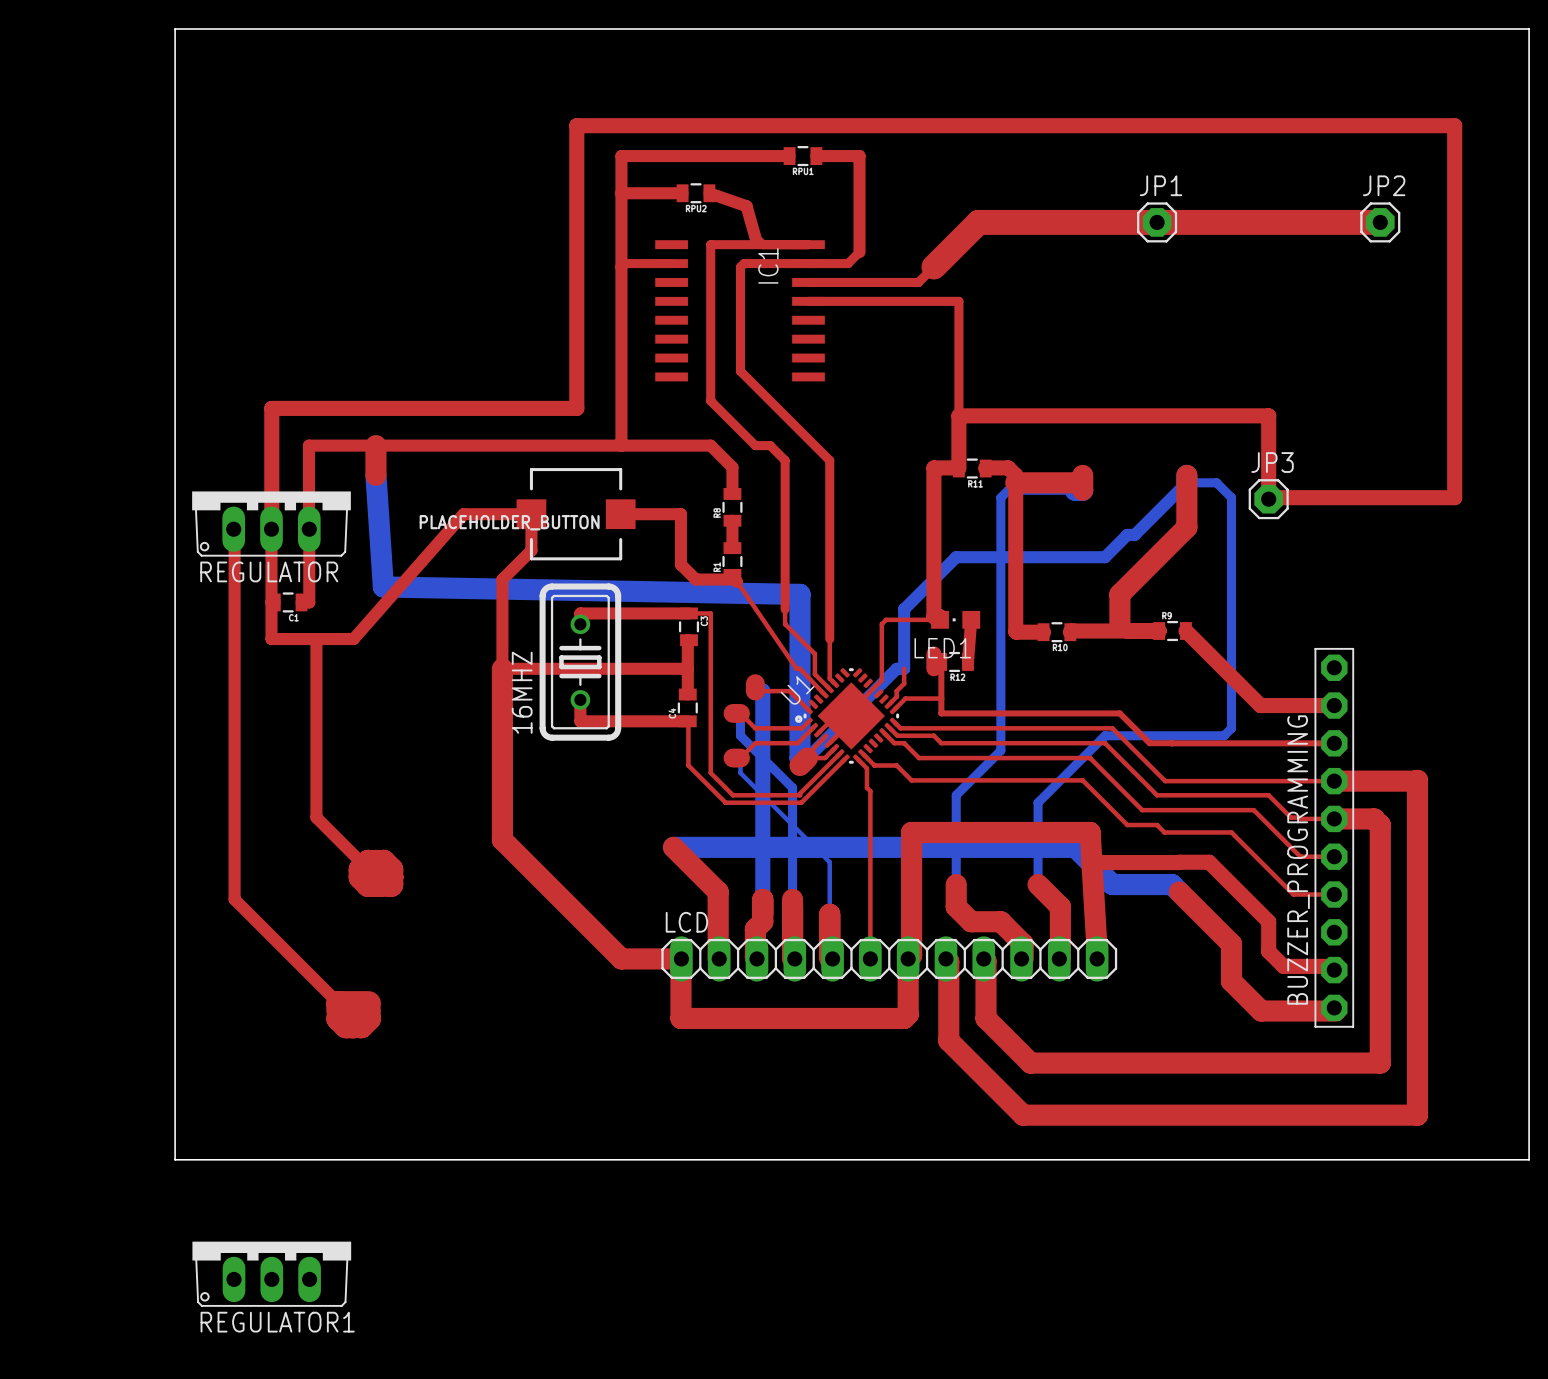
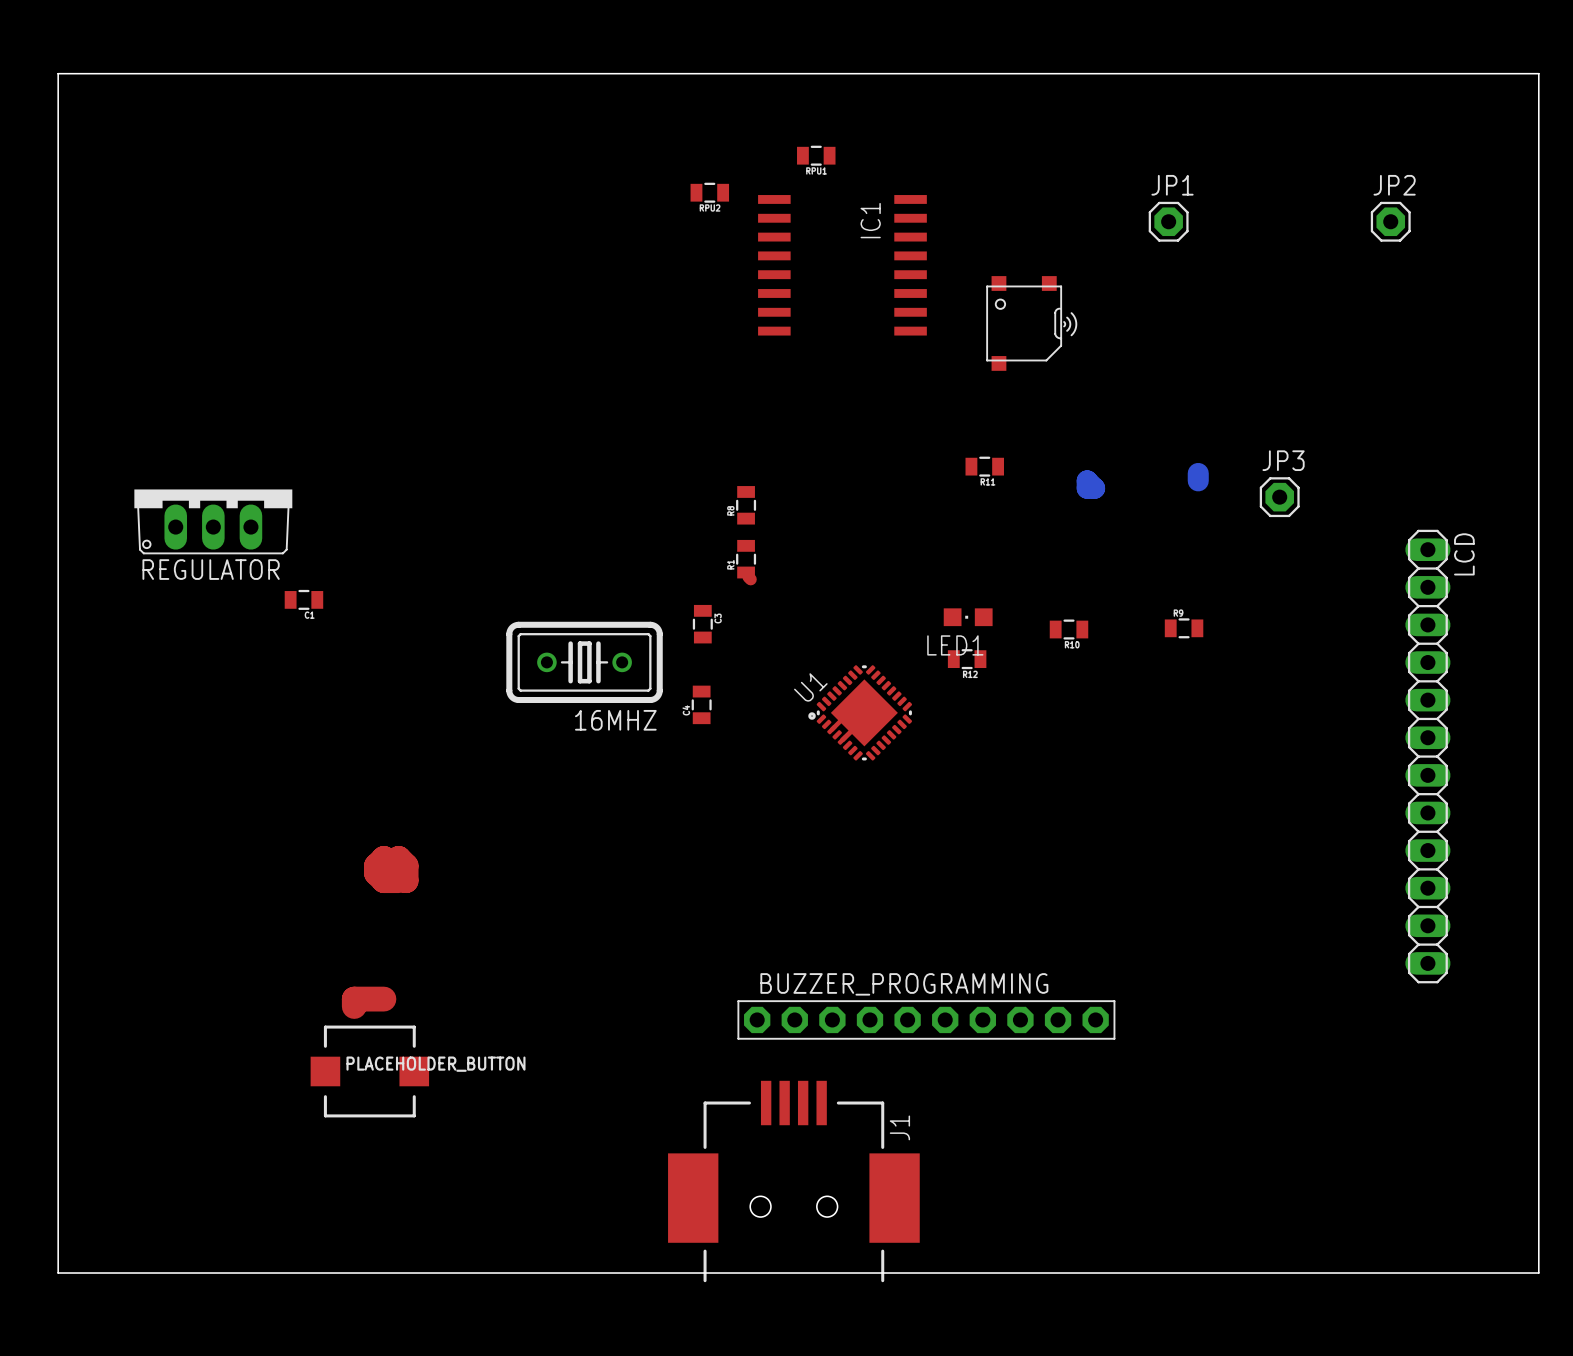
board edge: (1529, 73) (1529, 29) (175, 29) (175, 1159) (1529, 1159) -> (1538, 73) (58, 73) (58, 1273) (1538, 1273) (1538, 1154)
top track: (789, 156) (621, 156) (621, 445) -> none
top track: (816, 156) (859, 156) (859, 252) (848, 263) (743, 263) (740, 267) (740, 371) (829, 460) (829, 678) (834, 683) -> none
top track: (621, 193) (682, 193) -> none
top track: (709, 193) (746, 206) (755, 237) (762, 244) -> none
top track: (1380, 222) (978, 222) (918, 282) (808, 282) -> none
top track: (808, 244) (710, 244) (710, 400) (755, 445) (770, 445) (785, 460) (785, 624) (814, 653) (814, 674) (829, 688) -> none
top track: (671, 263) (624, 263) (621, 267) -> none
top track: (808, 301) (958, 301) (958, 415) -> none
IC1 position: (740, 310) -> (842, 265)
part: none -> (1031, 323)
top track: (958, 415) (1268, 415) (1268, 505) -> none
top track: (958, 415) (958, 468) (933, 467) (933, 616) (940, 616) (940, 619) (886, 619) (881, 624) (881, 680) (863, 698) (859, 698) (859, 713) -> none
top track: (375, 445) (375, 475) -> none
top track: (985, 468) (1008, 467) (1015, 475) (1015, 631) (1043, 632) -> none
bottom track: (375, 475) (383, 586) (800, 594) (800, 758) (803, 761) -> none
top track: (1082, 475) (1082, 490) -> none
top track: (1186, 475) (1186, 527) (1119, 594) (1119, 624) (1126, 631) -> none
top track: (1015, 482) (1075, 482) -> none
bottom track: (1082, 482) (1075, 490) (1008, 490) (1000, 497) (1000, 750) (956, 795) (956, 884) -> none
top track: (732, 493) (732, 467) (710, 445) (308, 445) (308, 529) -> none
top track: (1268, 497) (1454, 497) (1454, 125) (576, 125) (576, 408) (271, 408) (271, 527) -> none
PLACEHOLDER_BUTTON: (576, 514) -> none
top track: (620, 514) (680, 514) (680, 564) (695, 579) (734, 579) (732, 574) (796, 668) (800, 668) (823, 693) -> none
top track: (732, 520) (732, 548) -> none
REGULATOR position: (271, 524) -> (213, 521)
top track: (234, 527) (234, 899) (353, 1018) -> none
top track: (271, 529) (271, 639) (353, 639) (463, 514) (531, 514) (531, 550) (502, 579) (502, 668) -> none
top track: (309, 529) (309, 602) (301, 602) -> none
top track: (971, 619) (967, 661) -> none
top track: (580, 624) (580, 613) (710, 613) (710, 772) (733, 795) (800, 795) (839, 753) -> none
top track: (1159, 631) (1070, 632) -> none
top track: (1185, 631) (1260, 705) (1334, 705) -> none
top track: (316, 639) (316, 817) (375, 877) -> none
top track: (689, 640) (687, 694) -> none
top track: (933, 653) (933, 668) -> none
16MHZ rotation: 0° (580, 662) -> 90° counterclockwise (584, 662)
top track: (941, 662) (941, 713) (1119, 713) (1149, 743) (1171, 743) -> none
top track: (502, 668) (687, 668) -> none
top track: (502, 668) (502, 839) (621, 958) (680, 958) -> none
top track: (904, 668) (904, 683) (896, 691) (896, 696) (889, 704) -> none
top track: (755, 683) (755, 691) (789, 691) (808, 709) -> none
bottom track: (755, 691) (762, 691) (762, 914) -> none
top track: (941, 698) (905, 698) (894, 709) -> none
top track: (580, 699) (580, 721) (687, 721) -> none
top track: (733, 713) (740, 713) (755, 728) (802, 728) (808, 722) -> none
bottom track: (740, 713) (740, 735) (792, 787) (792, 906) -> none
top track: (687, 721) (688, 765) (725, 802) (801, 802) (845, 759) -> none
top track: (894, 722) (900, 728) (1112, 728) (1165, 781) (1417, 780) (1417, 1115) (1023, 1115) (948, 1040) (948, 961) (945, 958) -> none
top track: (813, 727) (797, 743) (755, 743) (740, 758) (733, 758) -> none
top track: (889, 727) (897, 735) (933, 735) (941, 743) (1105, 743) (1157, 795) (1268, 795) (1291, 817) (1374, 818) (1380, 825) (1380, 1063) (1030, 1063) (985, 1018) (985, 961) (983, 958) -> none
top track: (883, 732) (894, 743) (904, 743) (919, 758) (1090, 758) (1142, 810) (1253, 810) (1300, 856) (1334, 856) -> none
top track: (823, 738) (807, 758) -> none
top track: (1172, 743) (1334, 743) -> none
top track: (834, 748) (825, 758) (807, 758) -> none
top track: (862, 753) (874, 765) -> none
bottom track: (740, 758) (740, 772) (829, 862) (829, 914) -> none
top track: (807, 758) (800, 765) -> none
top track: (857, 759) (866, 768) (866, 787) (870, 791) (870, 958) -> none
LCD: none -> (1427, 756)
bottom track: (800, 765) (896, 668) (904, 668) (904, 609) (956, 557) (1105, 557) (1127, 534) (1134, 534) (1186, 482) (1216, 482) (1231, 497) (1231, 728) (1224, 735) (1105, 735) (1038, 802) (1038, 884) -> none
top track: (874, 765) (896, 765) (911, 780) (1082, 780) (1127, 825) (1157, 825) (1164, 832) (1231, 832) (1293, 894) (1334, 894) -> none
BUZZER_PROGRAMMING: (1334, 837) -> none
top track: (673, 847) (718, 891) (718, 958) -> none
bottom track: (673, 847) (1075, 847) (1112, 884) (1171, 884) (1179, 891) -> none
top track: (1091, 862) (1209, 862) (1268, 921) (1268, 951) (1283, 966) (1330, 966) (1334, 970) -> none
top track: (956, 884) (956, 906) (971, 921) (1000, 921) (1023, 944) (1023, 958) -> none
top track: (1038, 884) (1060, 906) (1060, 958) -> none
top track: (1179, 891) (1231, 944) (1231, 981) (1261, 1011) (1335, 1011) -> none
top track: (762, 899) (762, 921) (755, 929) (755, 957) (757, 958) -> none
top track: (792, 899) (792, 958) -> none
top track: (681, 958) (680, 1018) (904, 1018) (908, 1014) (908, 958) (911, 955) (911, 832) (1090, 832) (1097, 958) -> none
LCD: (889, 958) -> none
top track: (353, 1011) (353, 1025) (346, 1025) (338, 1018) (368, 1018) (361, 1025) (361, 1018) (368, 1011) -> none
BUZZER_PROGRAMMING: none -> (926, 1019)
PLACEHOLDER_BUTTON: none -> (369, 1071)
J1: none -> (793, 1181)
REGULATOR1: (271, 1274) -> none

